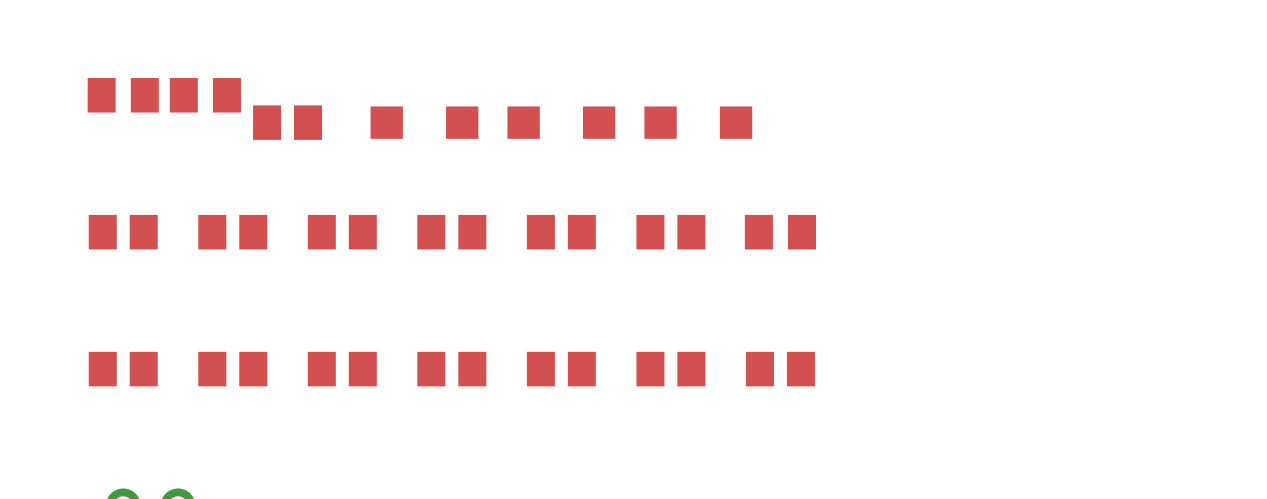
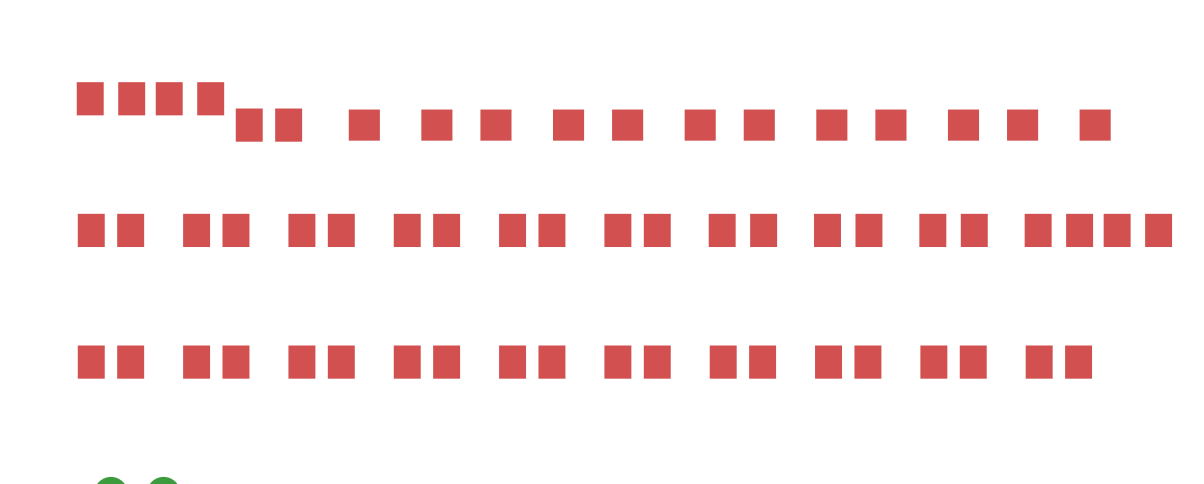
part: none -> (795, 125)
part: none -> (927, 125)
part: none -> (1058, 125)
part: none -> (848, 230)
part: none -> (953, 230)
part: none -> (1058, 230)
part: none -> (1137, 230)
part: none -> (848, 362)
part: none -> (953, 362)
part: none -> (1058, 362)

